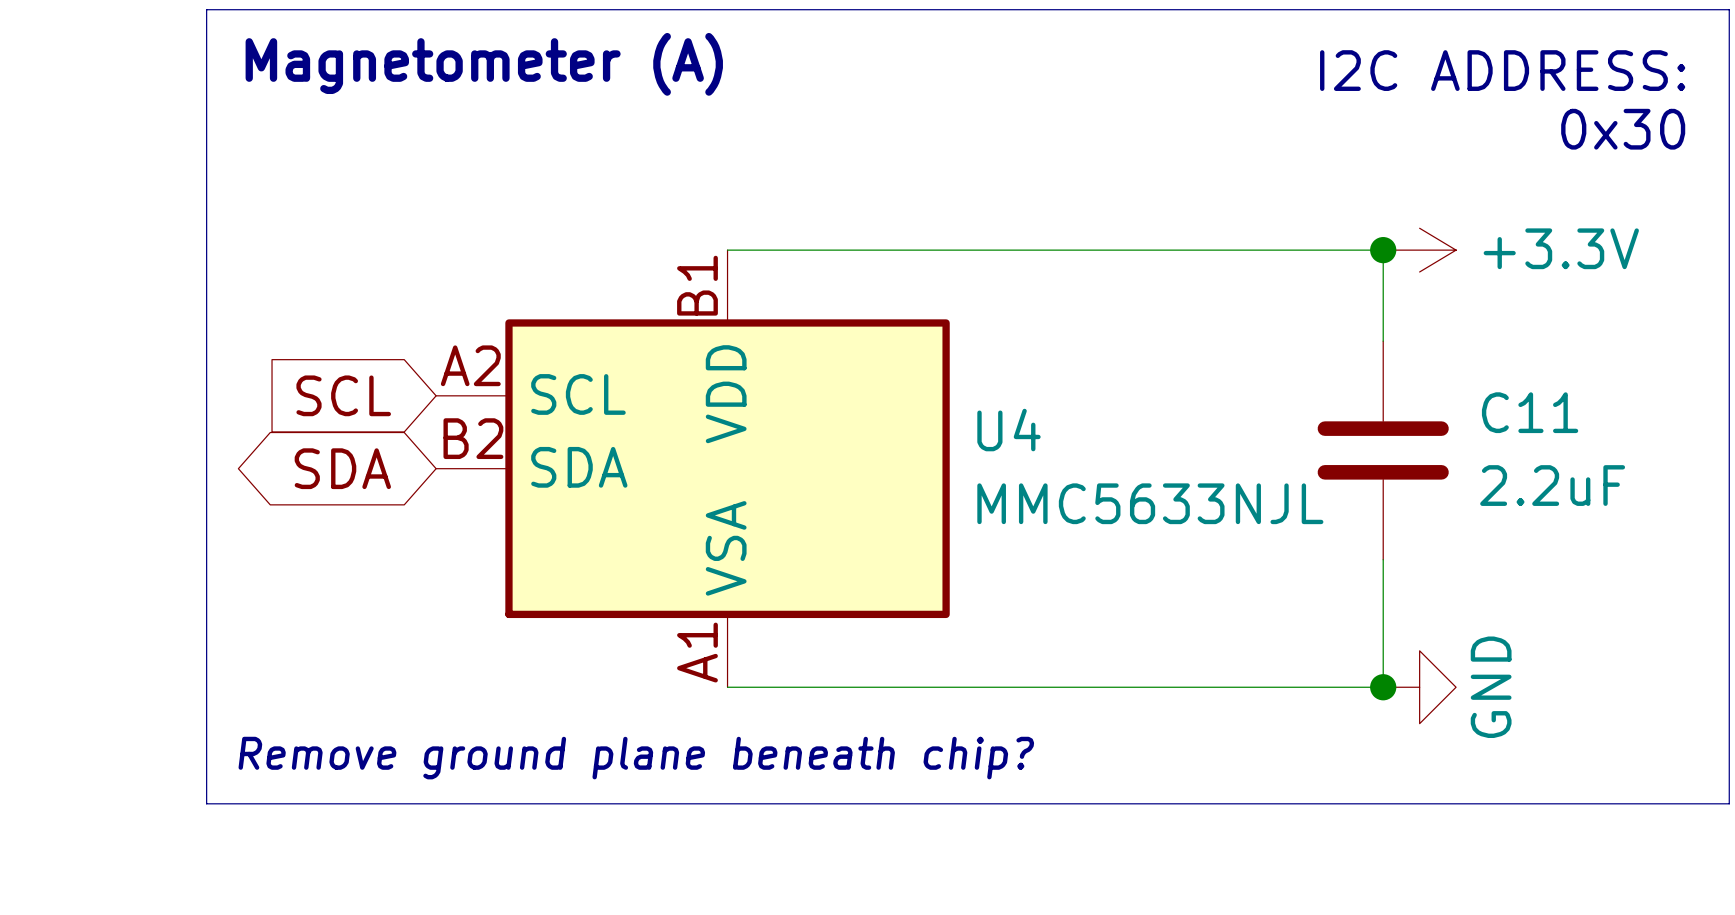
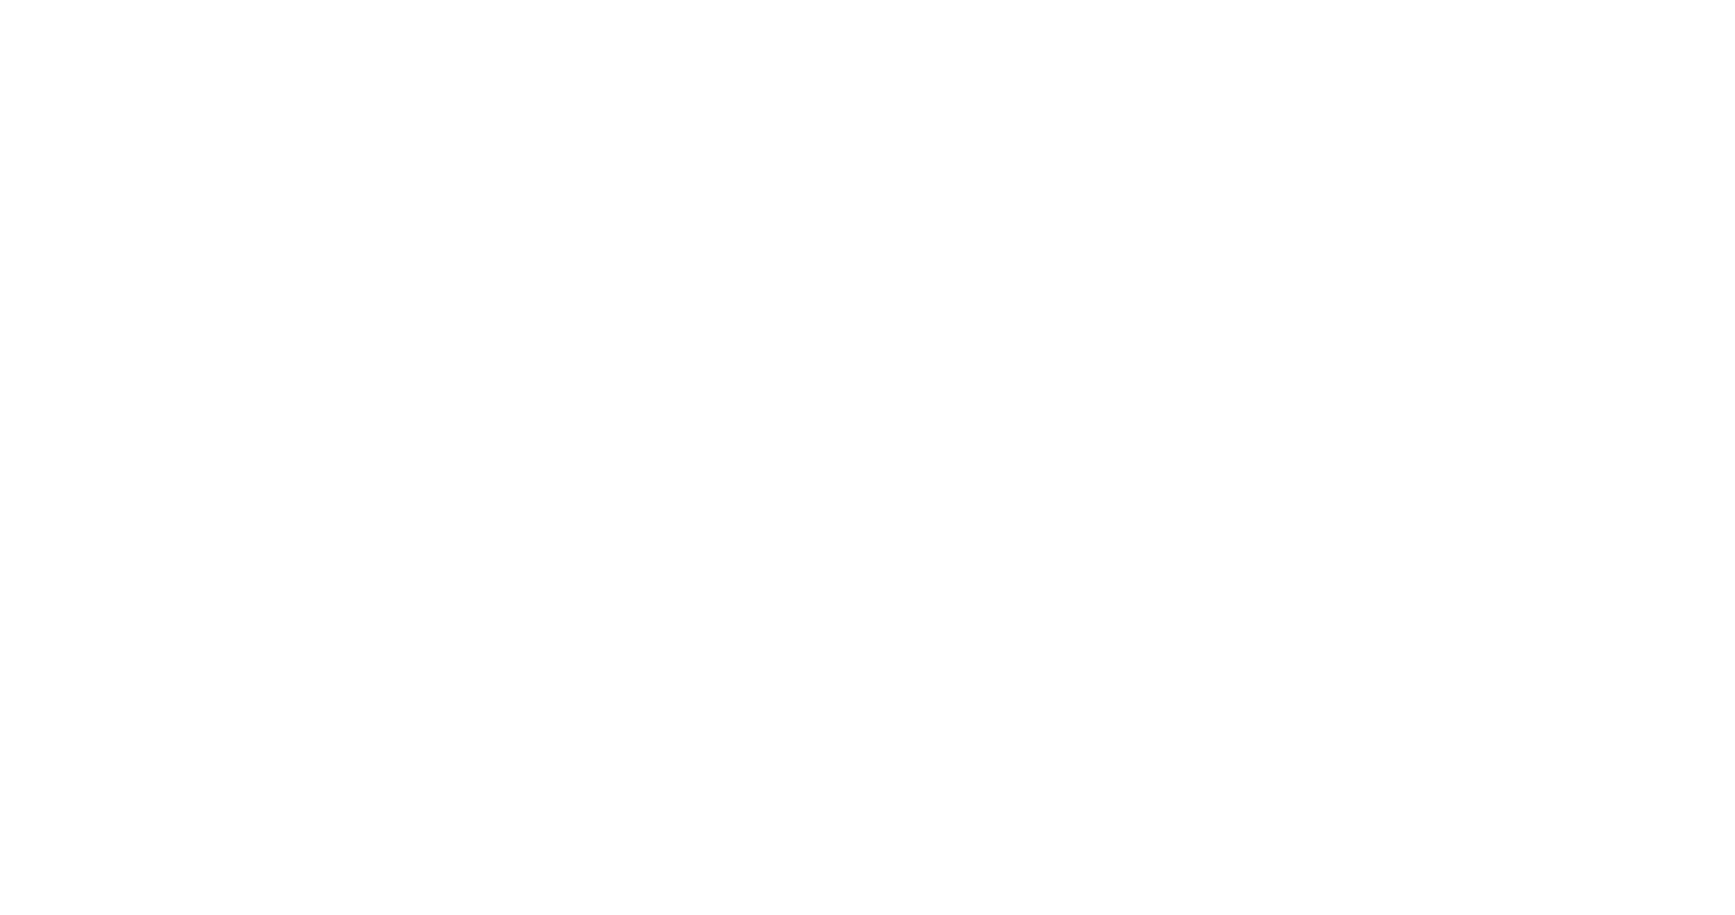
line: (206, 9) (1729, 9) (1729, 803) (206, 803) (206, 9) -> none
text: Magnetometer (A) (484, 64) -> none
text: I2C ADDRESS: (1502, 70) -> none
text: 0x30 (1623, 129) -> none
wire: (727, 250) (1383, 250) (1383, 341) -> none
junction: (1383, 250) -> none
power symbol: +3.3V (1419, 250) -> none
global label: SCL (343, 395) -> none
C11: 2.2uF (1383, 450) -> none
global label: SDA (342, 468) -> none
U4: MMC5633NJL (692, 468) -> none
wire: (1383, 559) (1383, 687) (727, 687) -> none
junction: (1383, 687) -> none
power symbol: GND (1419, 687) -> none
text: Remove ground plane beneath chip? (636, 758) -> none

